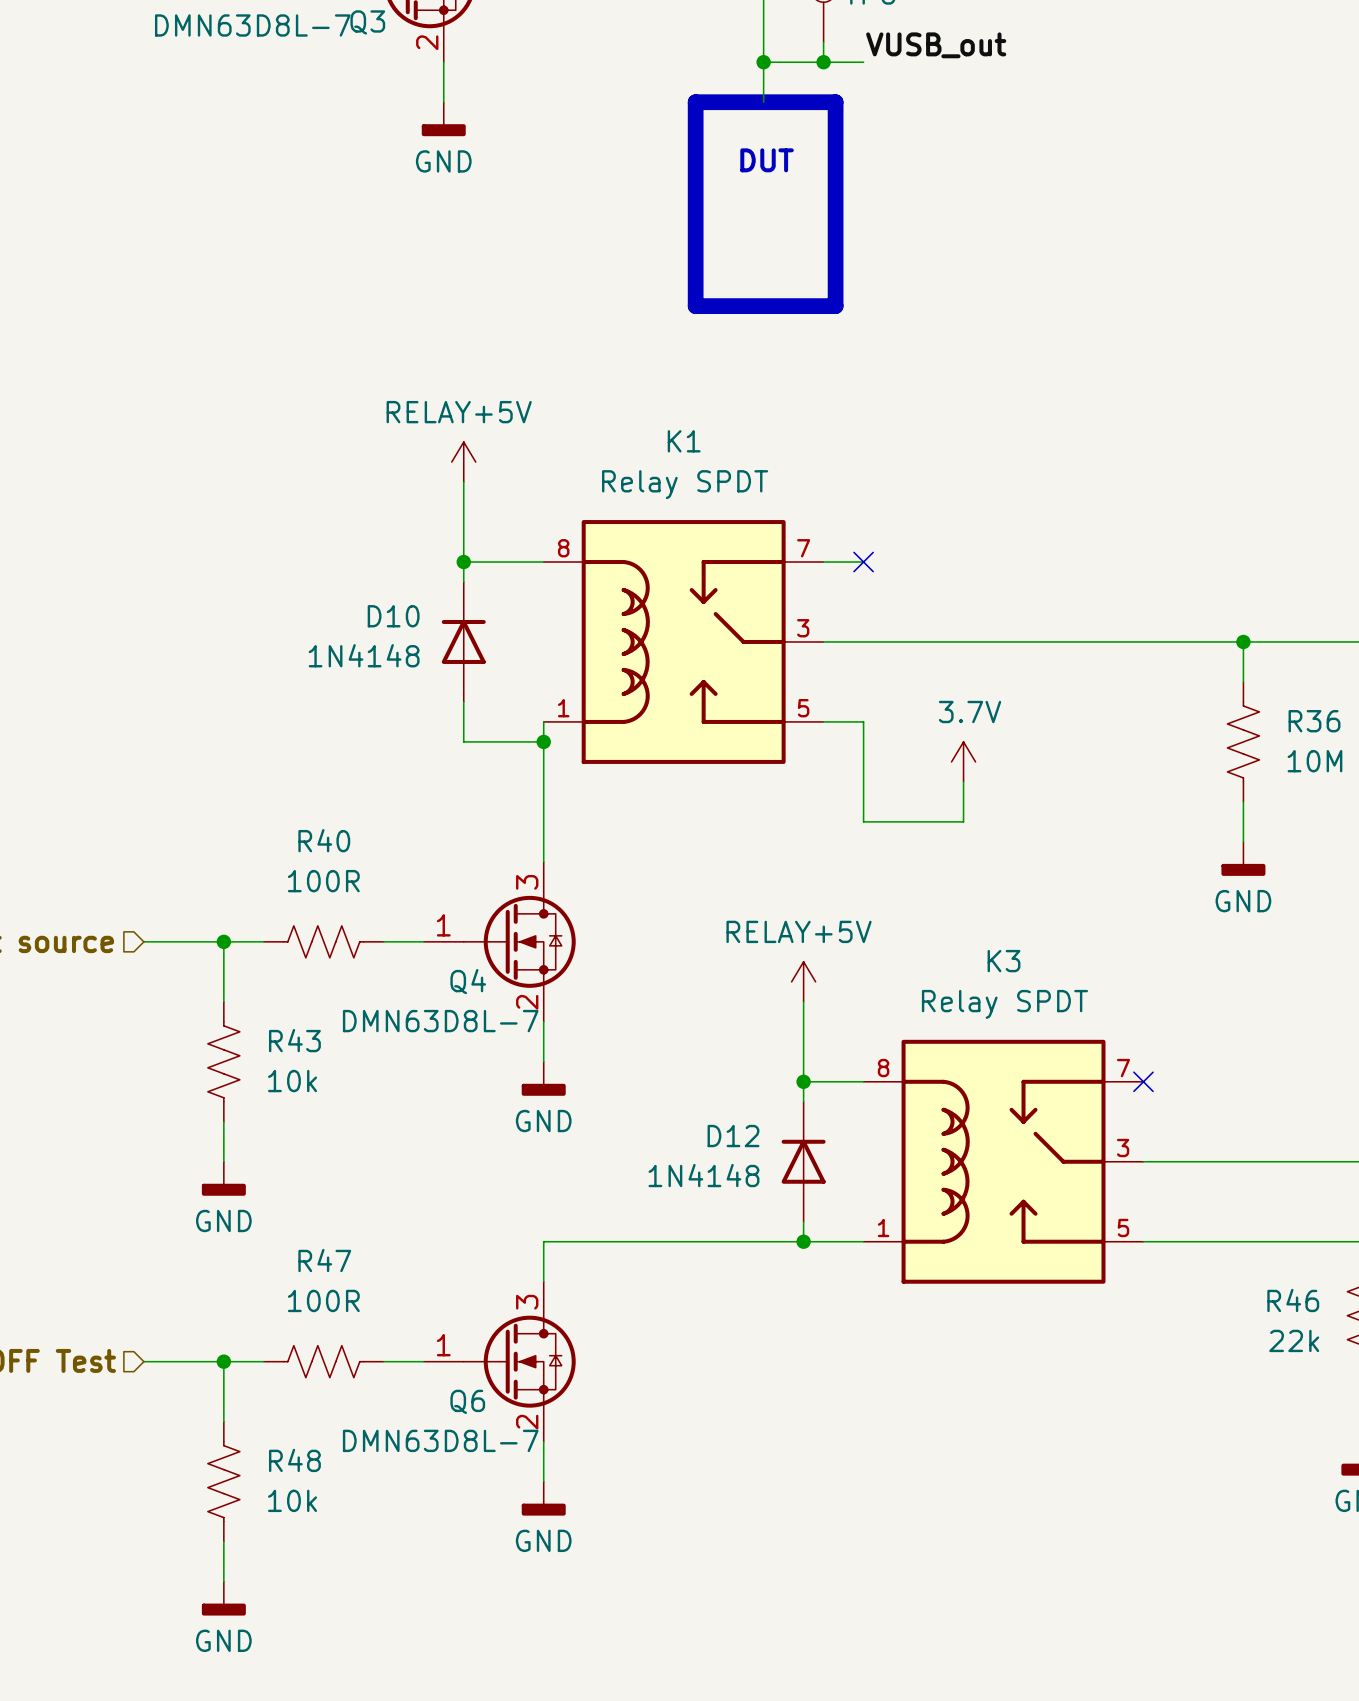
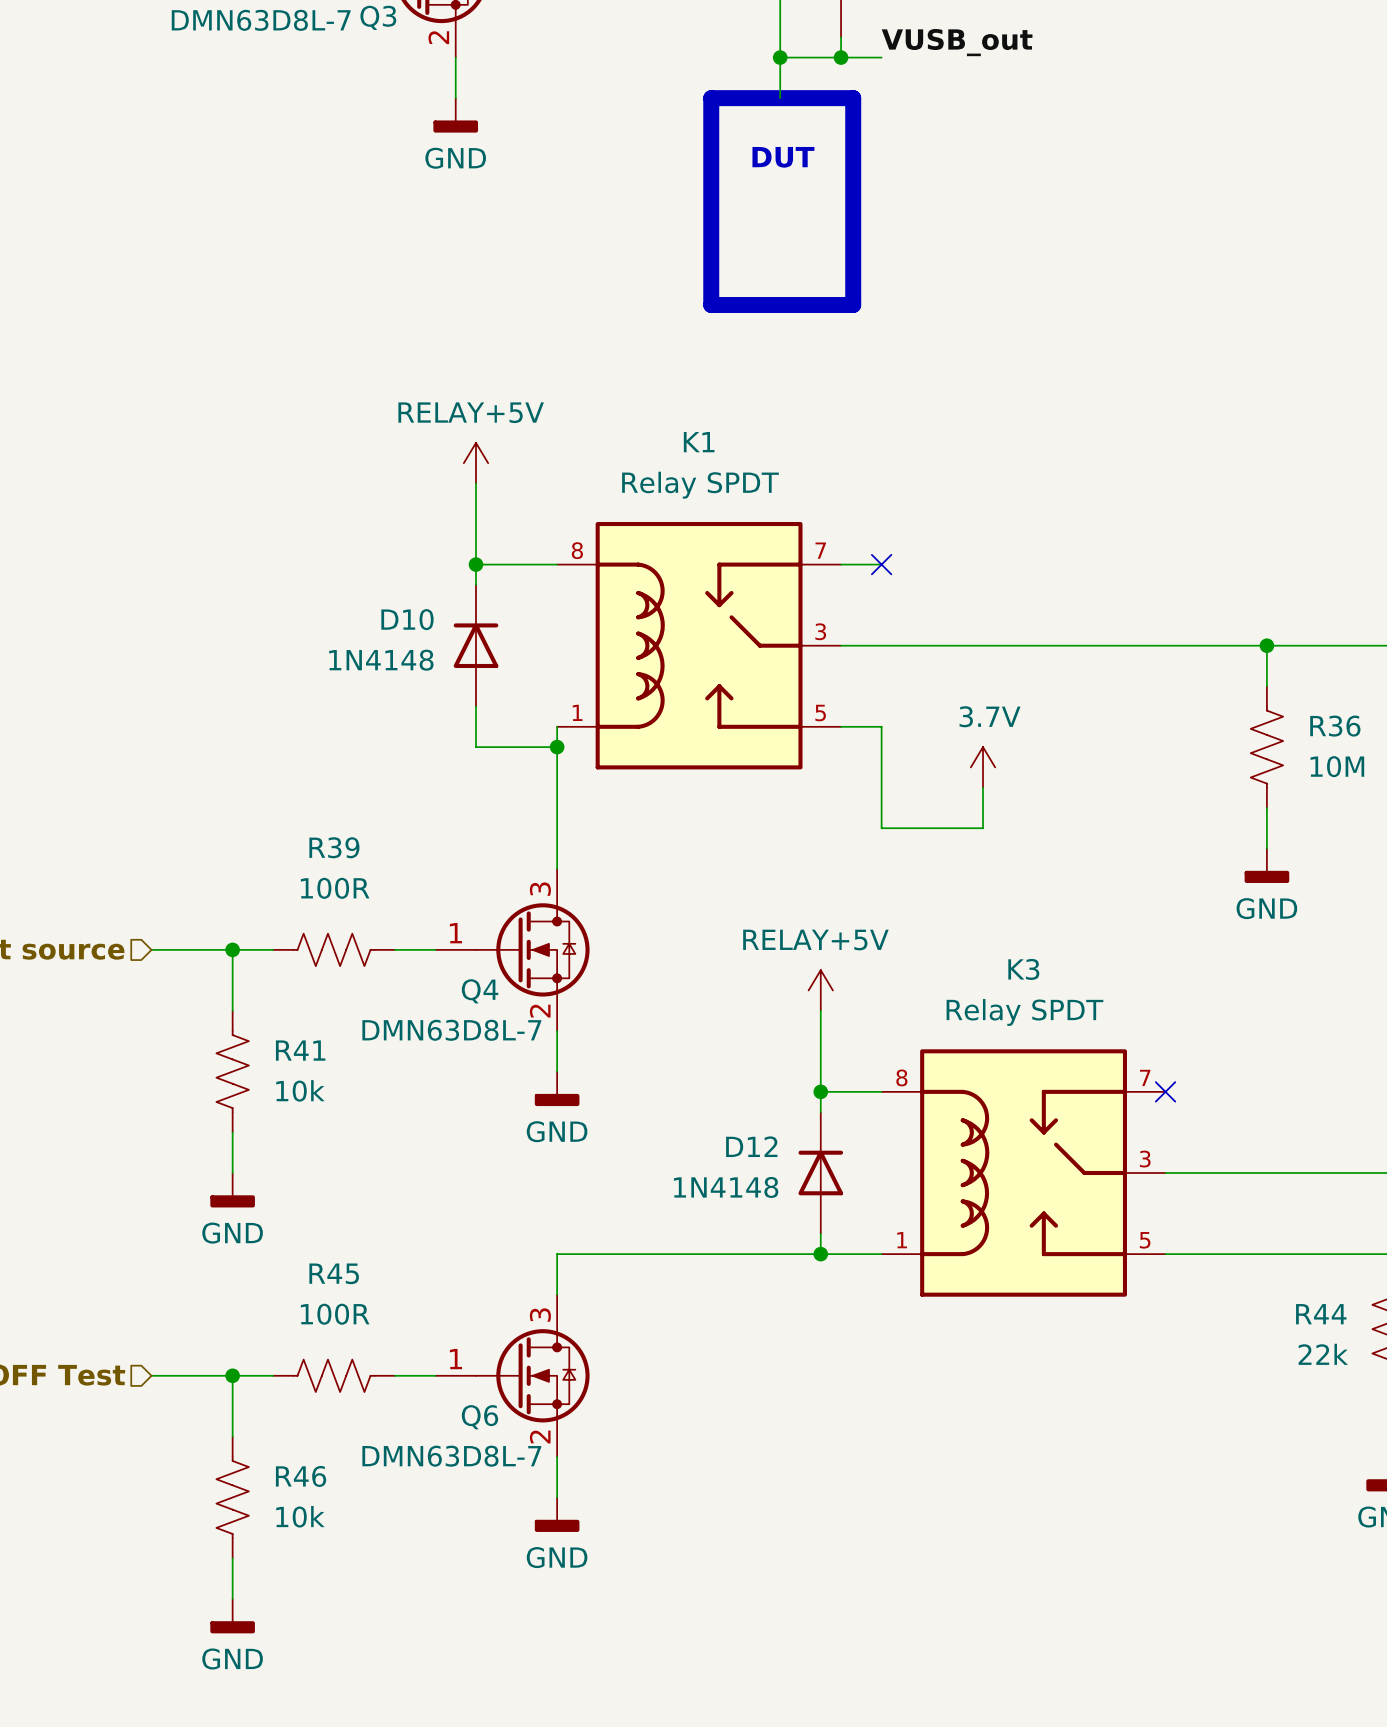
R40 name: R40 (324, 840) -> R39 (334, 847)
R43 name: R43 (294, 1040) -> R41 (300, 1050)
R47 name: R47 (324, 1260) -> R45 (334, 1273)
R46 name: R46 (1293, 1300) -> R44 (1321, 1314)
R48 name: R48 (294, 1460) -> R46 (301, 1476)

